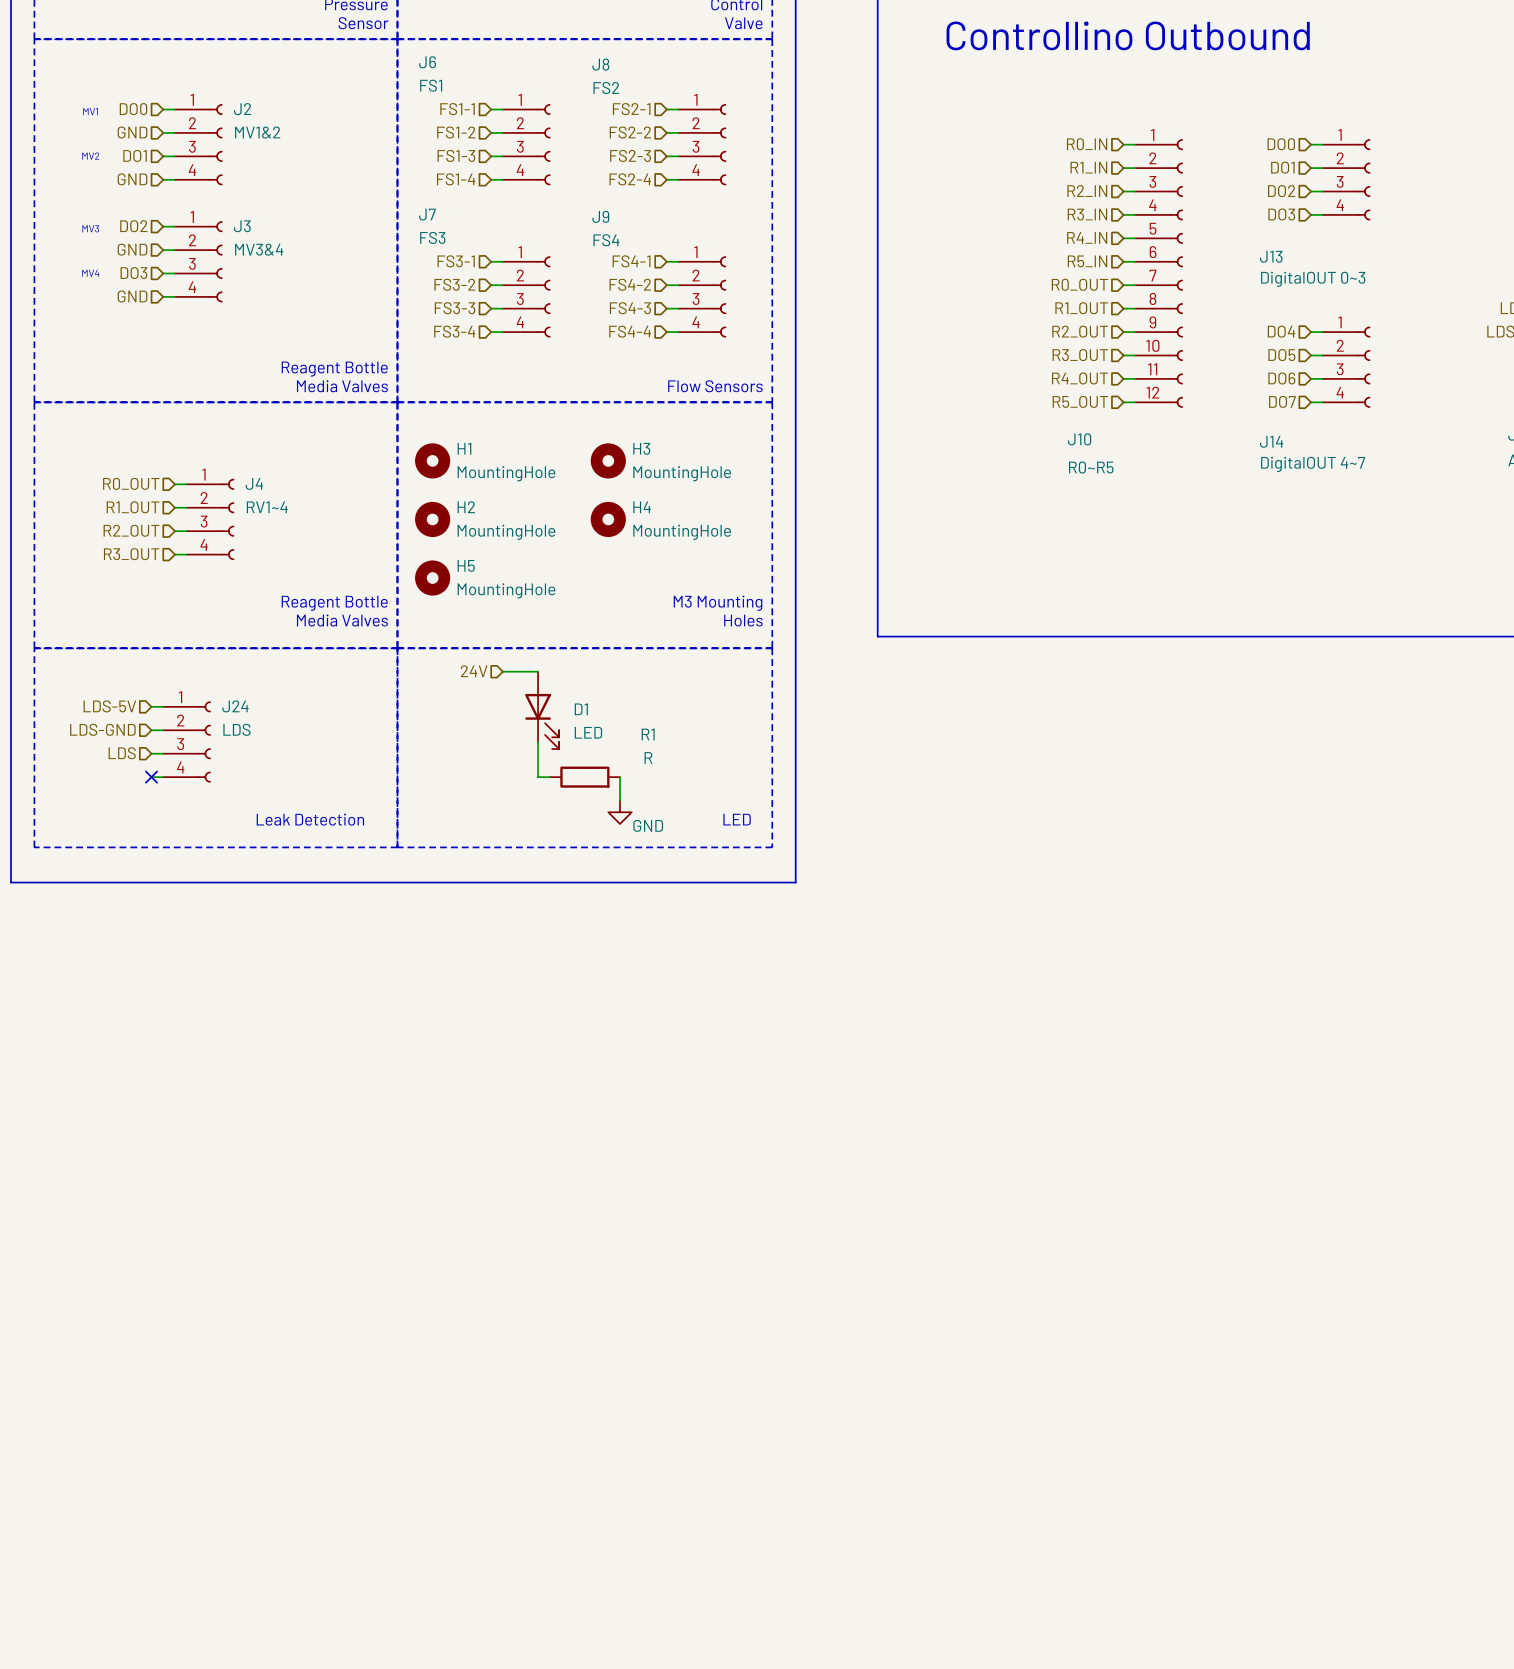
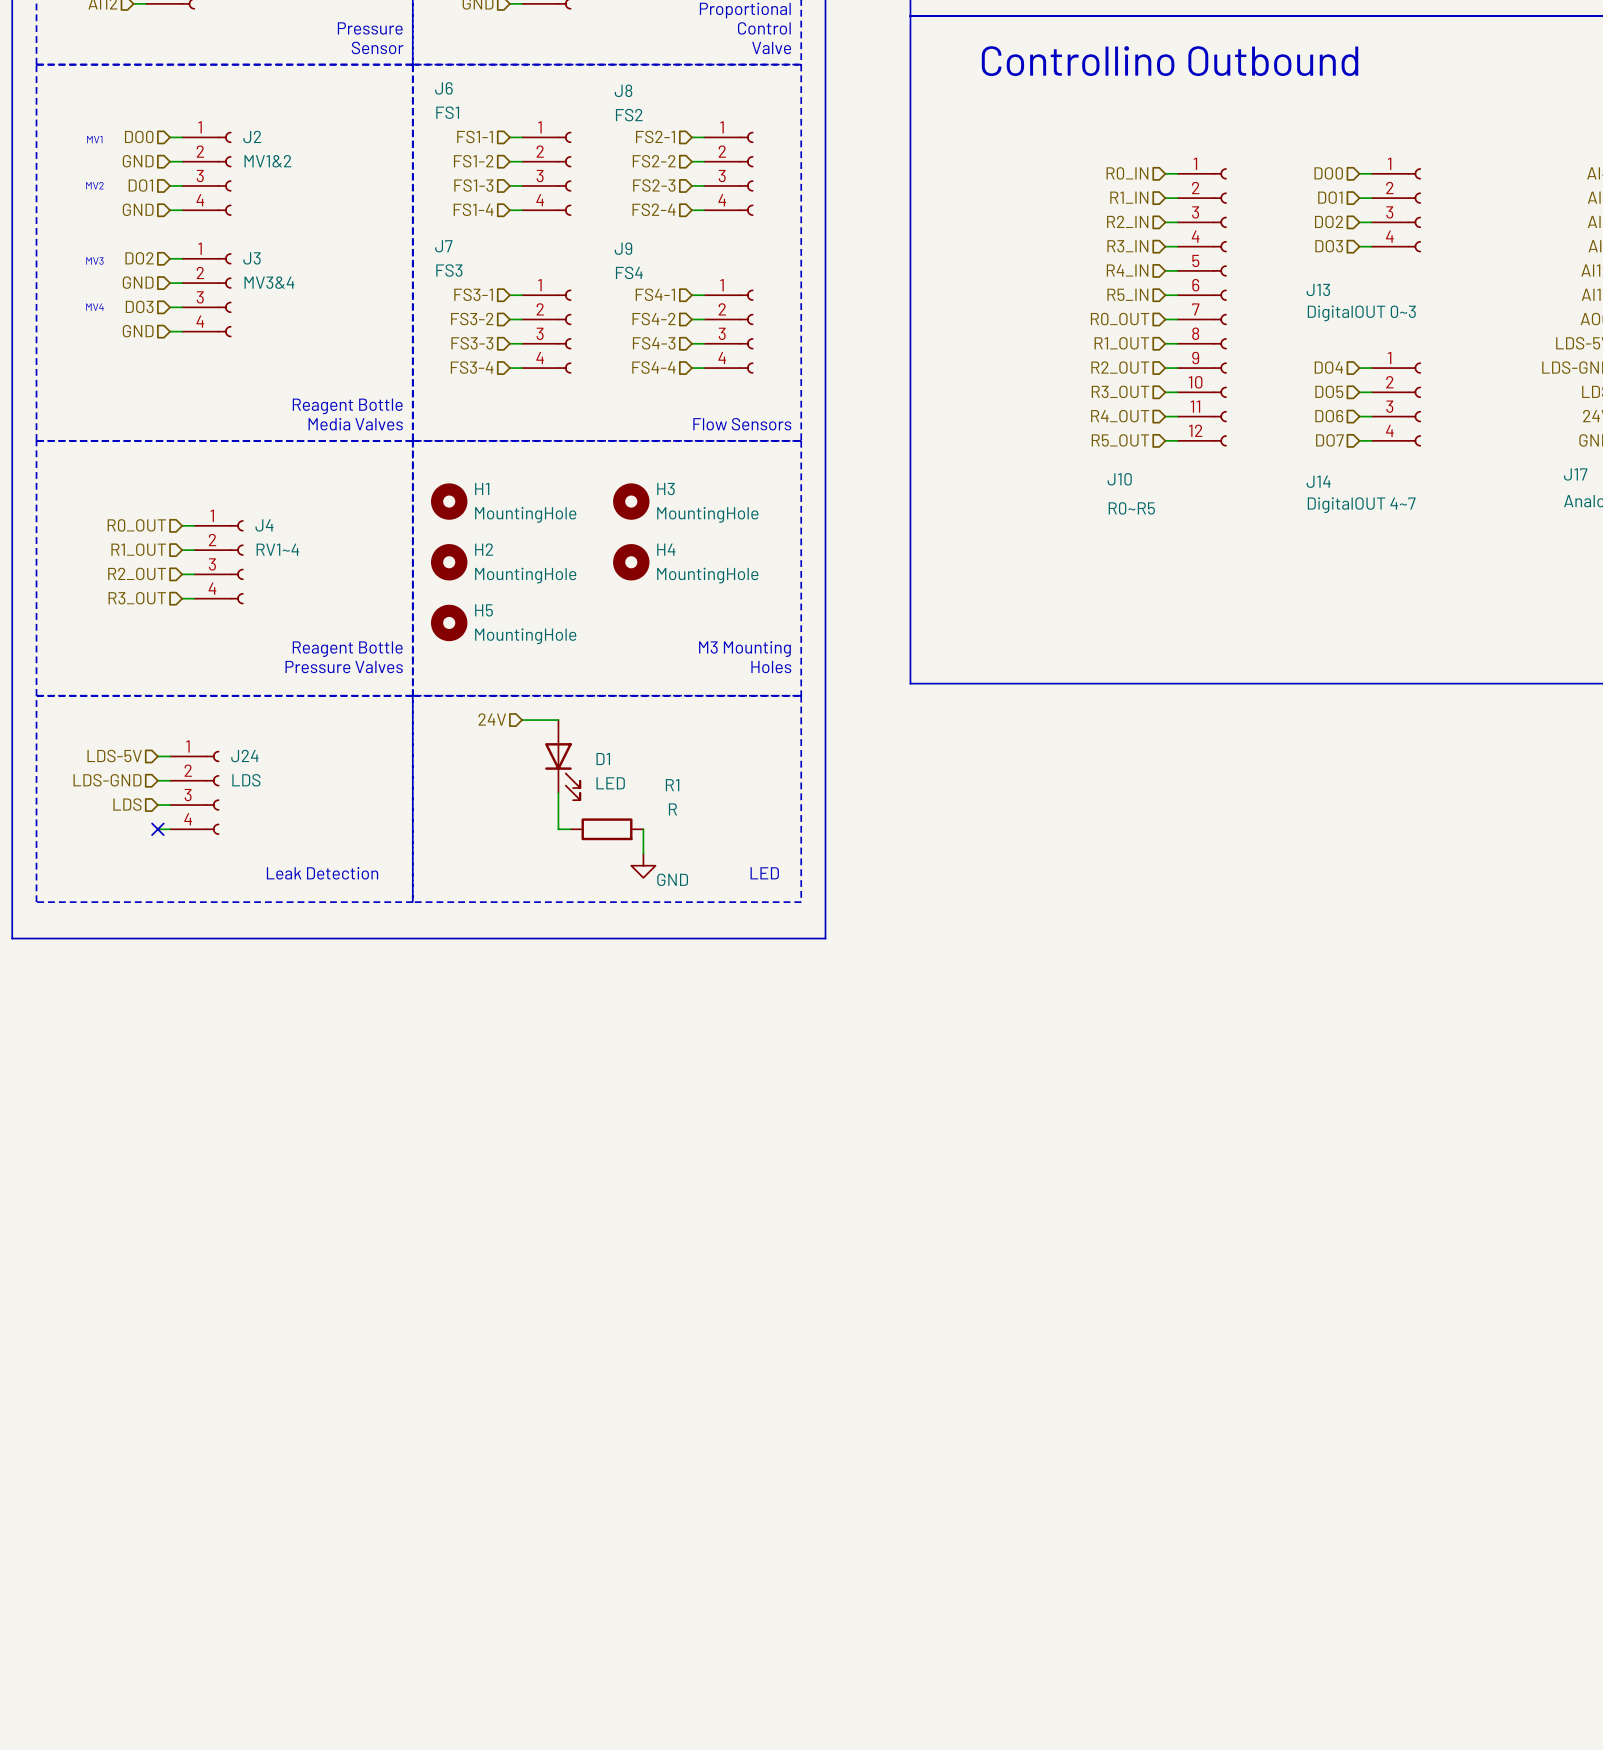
text: Media Valves (342, 620) -> Pressure Valves (344, 667)

